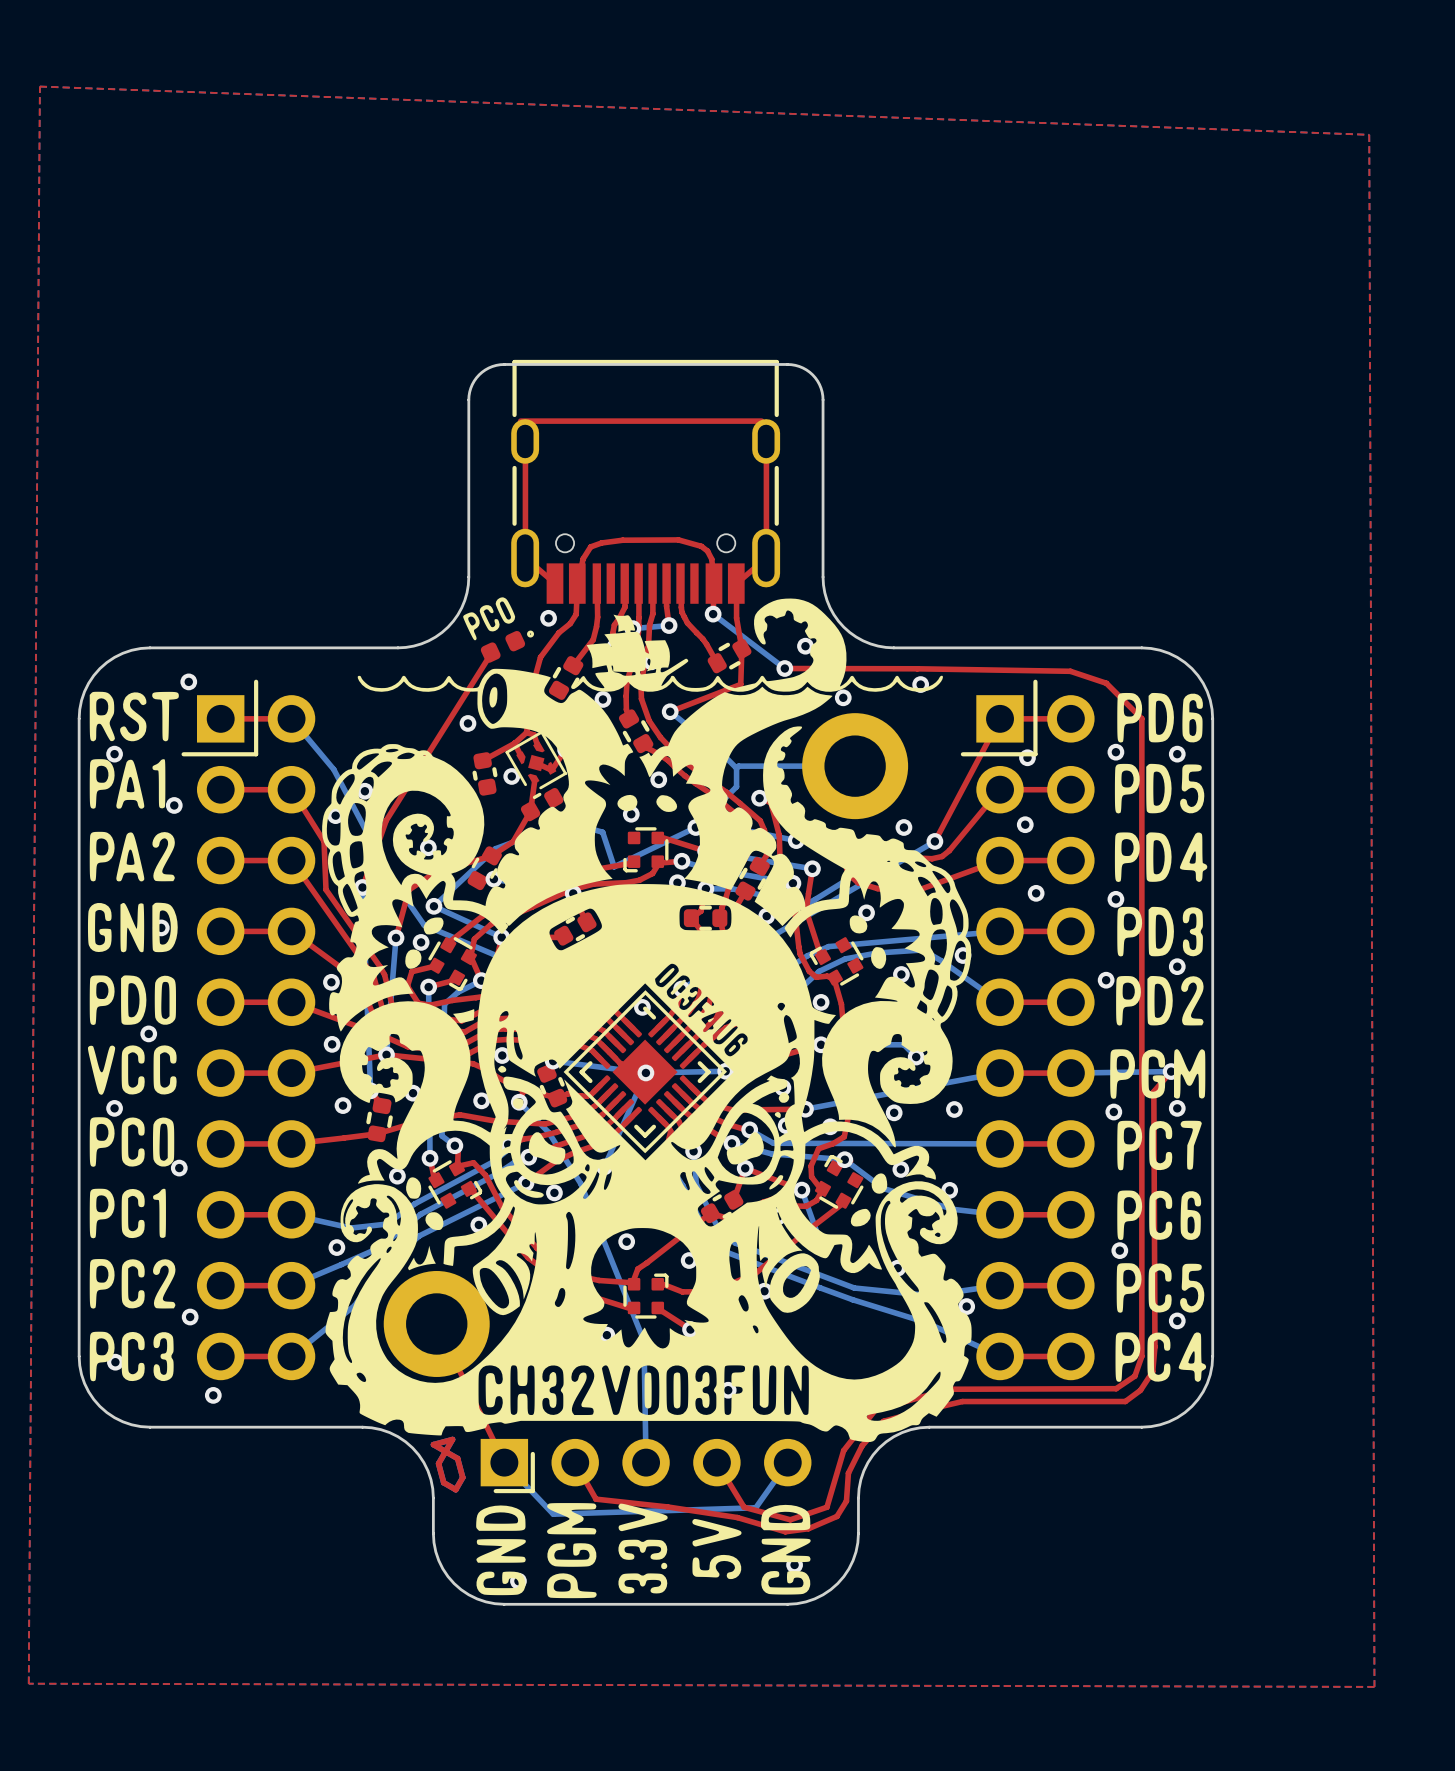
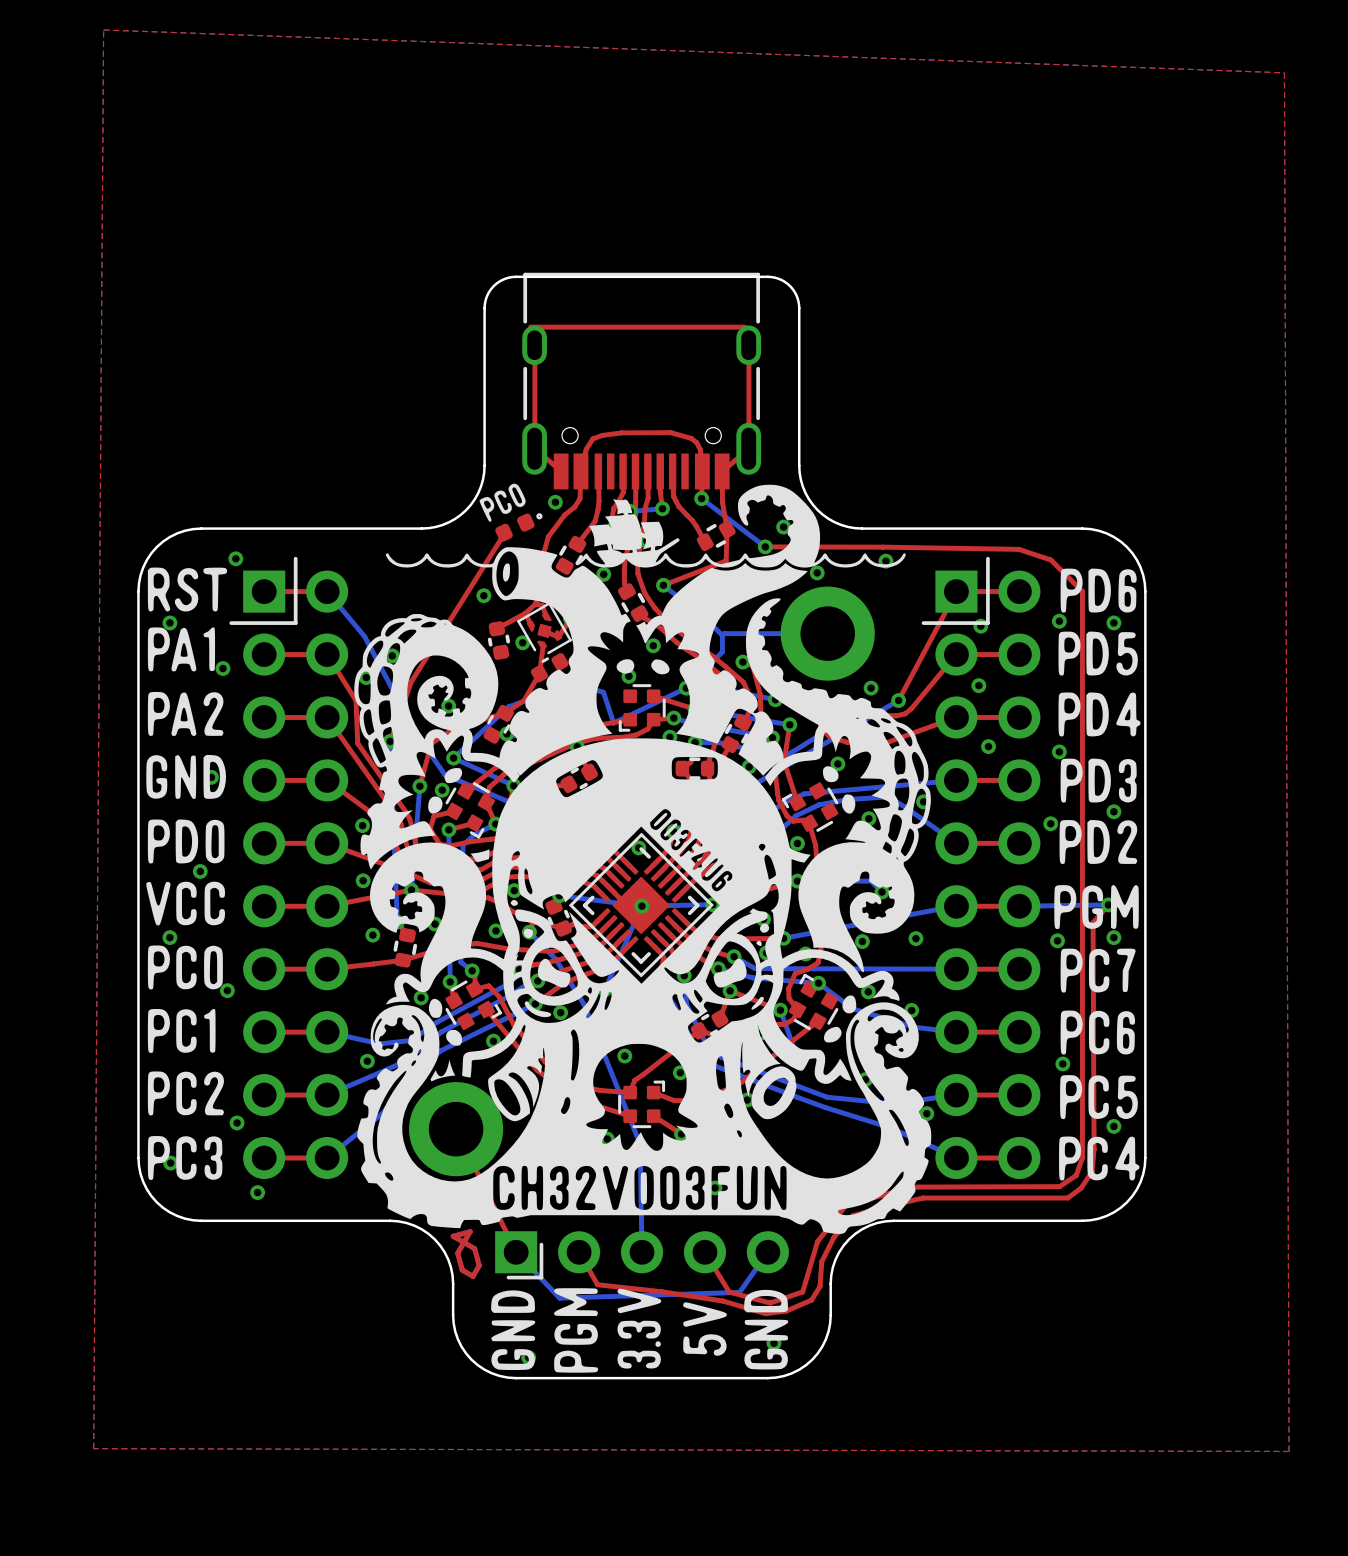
part footprint: [623, 827, 669, 873] -> [618, 684, 666, 732]
part footprint: [428, 937, 477, 991] -> [445, 782, 496, 839]
part footprint: [809, 937, 864, 986] -> [781, 782, 839, 832]
part footprint: [814, 1154, 864, 1209] -> [788, 973, 839, 1031]
part footprint: [428, 1160, 483, 1209] -> [445, 980, 502, 1031]
part footprint: [623, 1273, 669, 1319] -> [618, 1080, 666, 1129]

